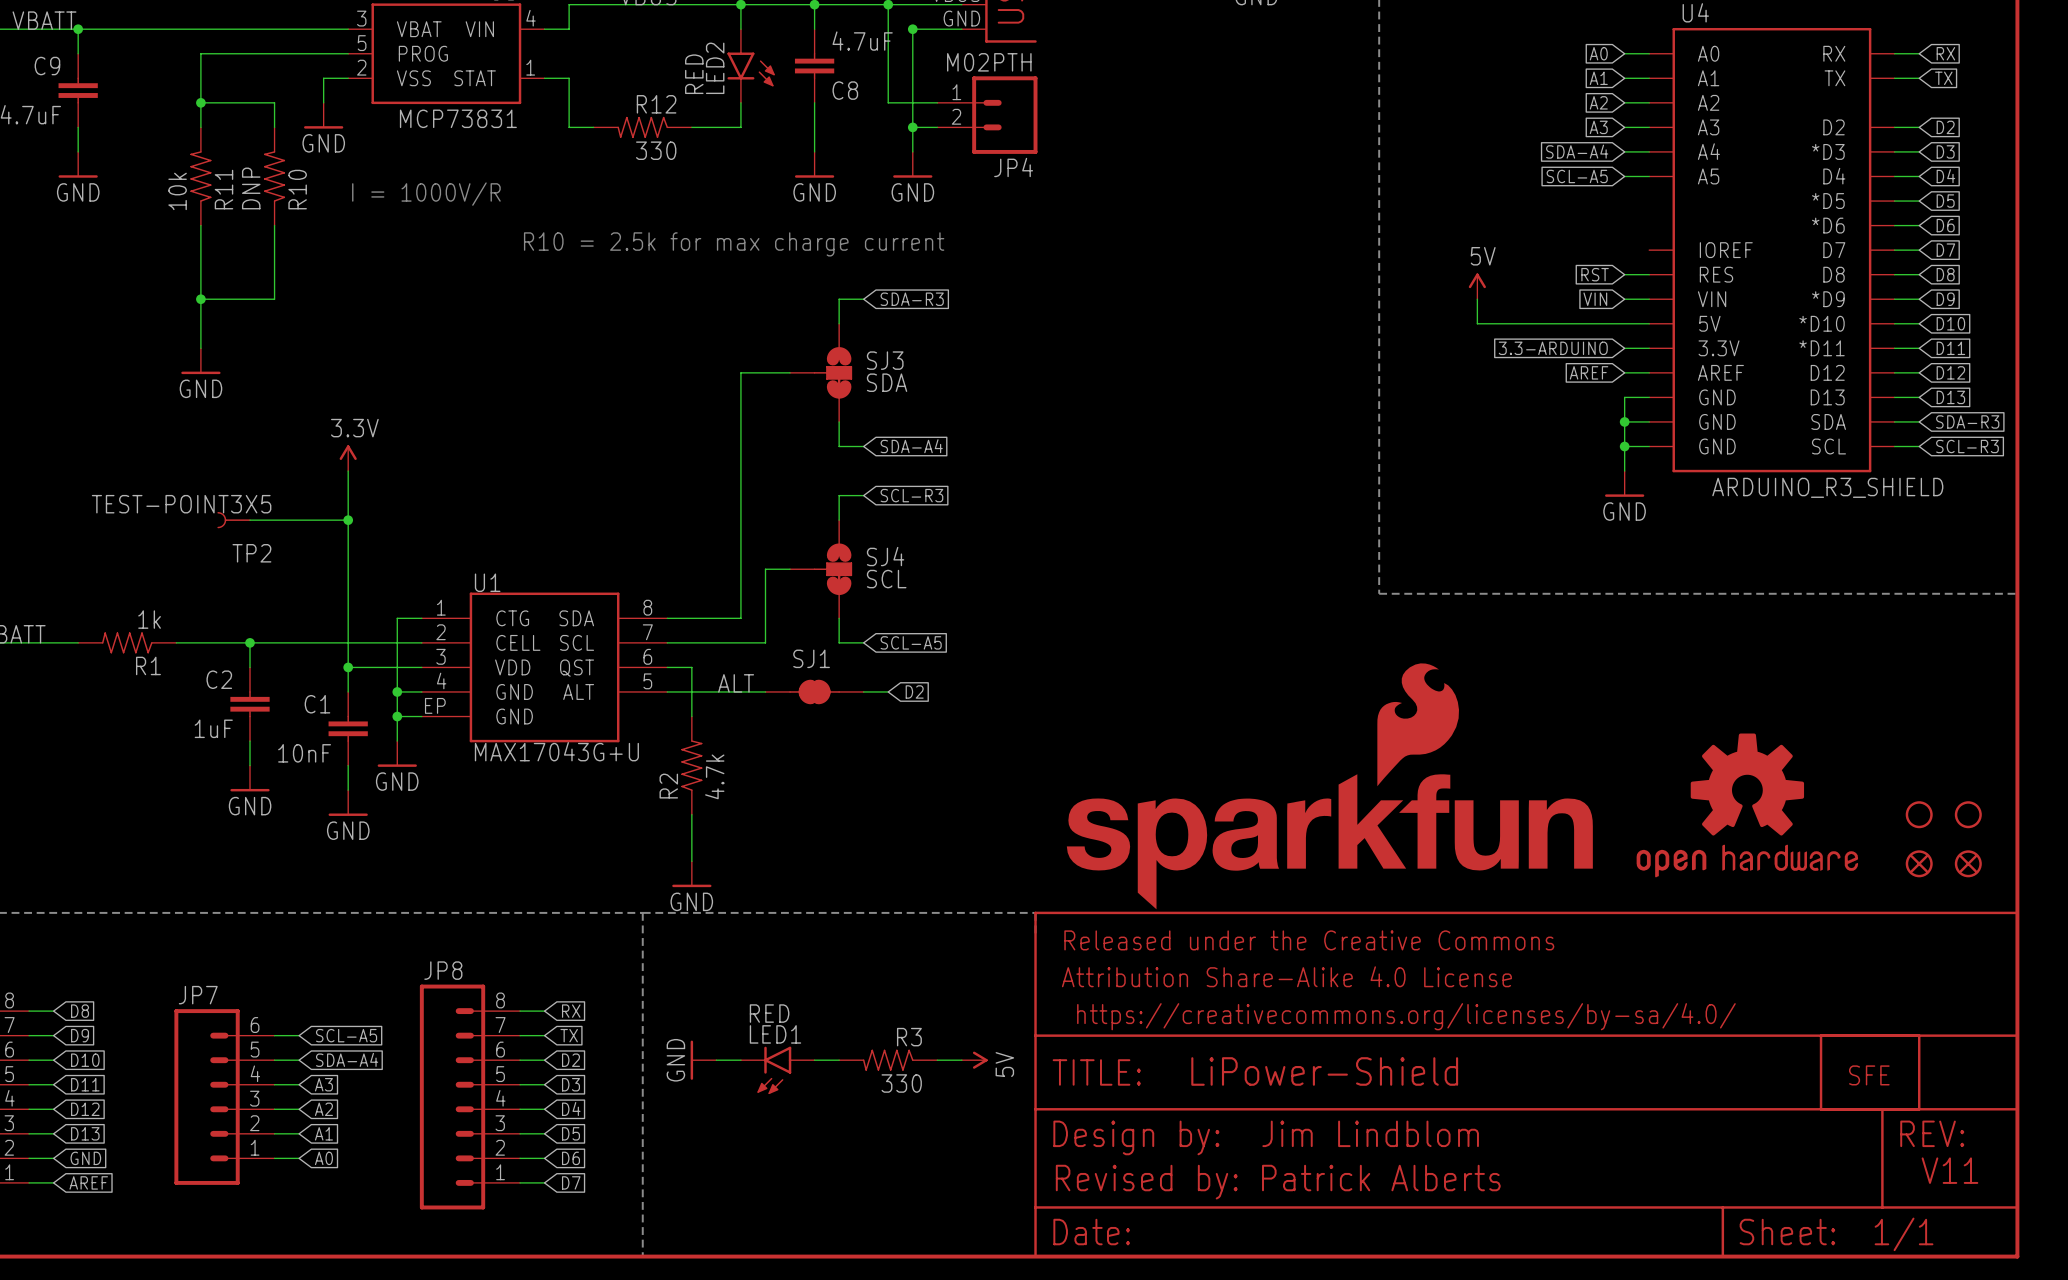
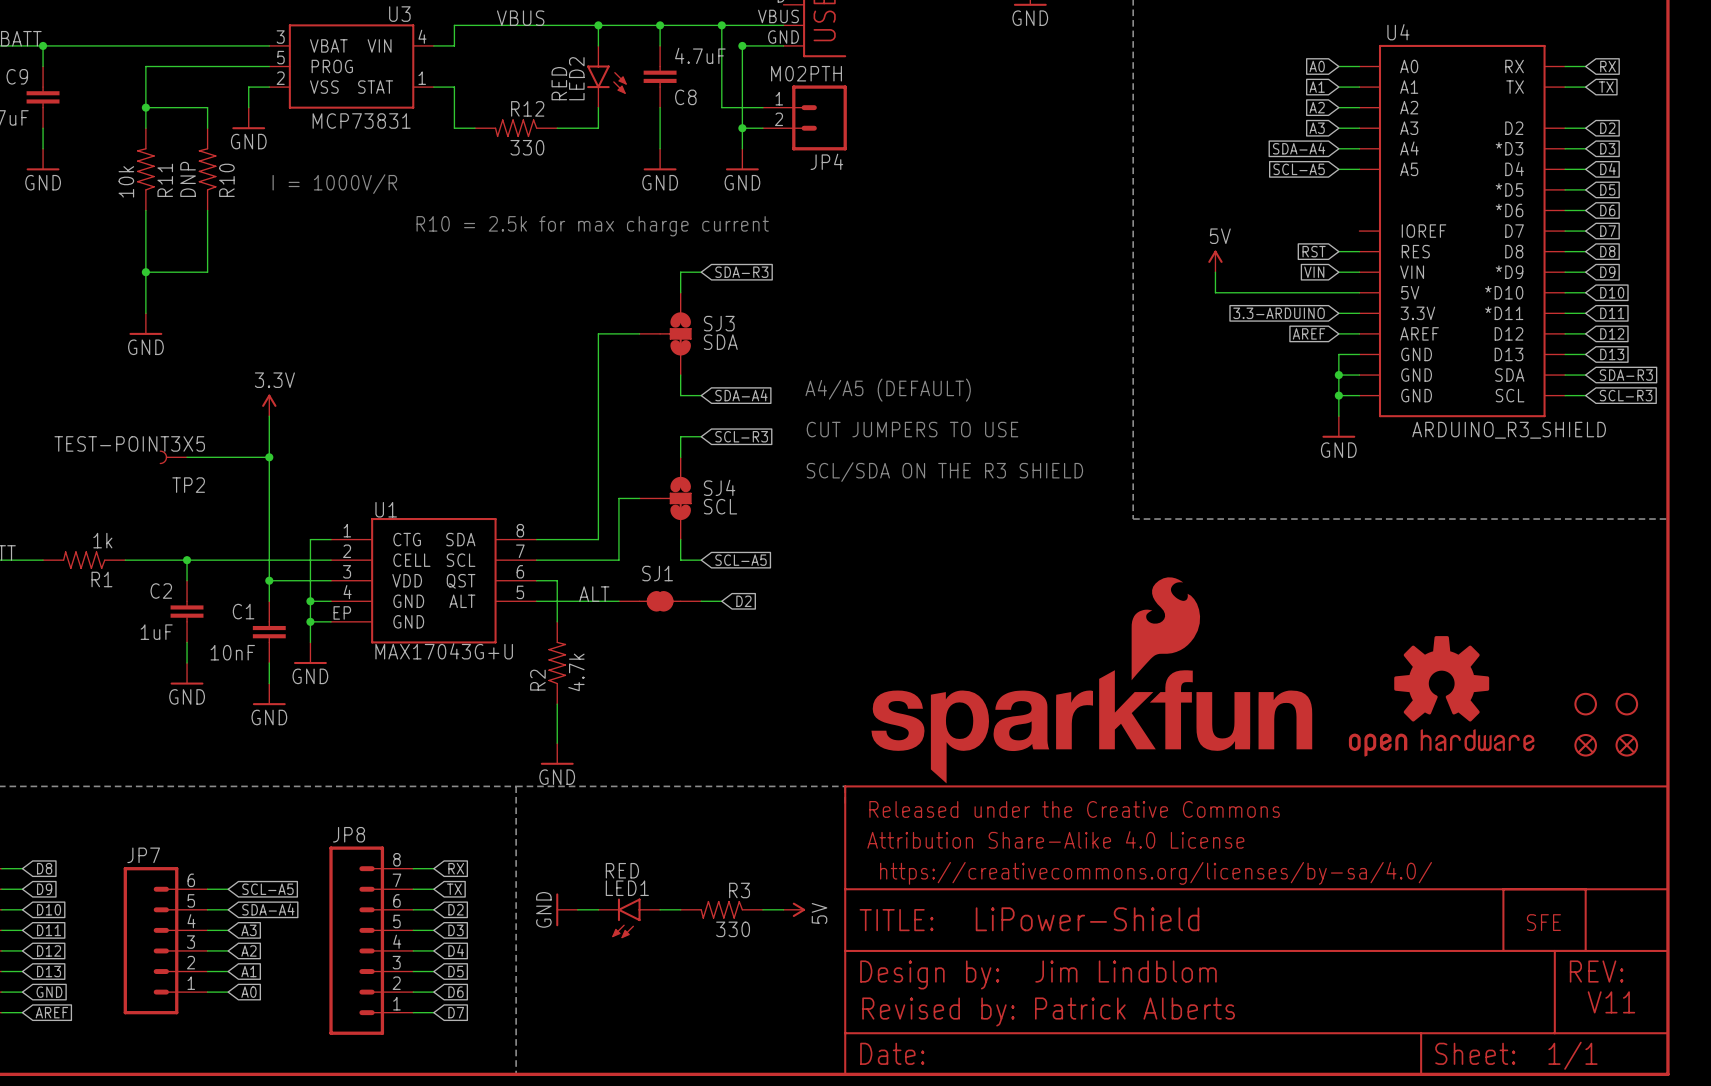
text: none -> A4/A5 (DEFAULT) (888, 390)
text: none -> CUT JUMPERS TO USE (912, 429)
text: none -> SCL/SDA ON THE R3 SHIELD (944, 472)

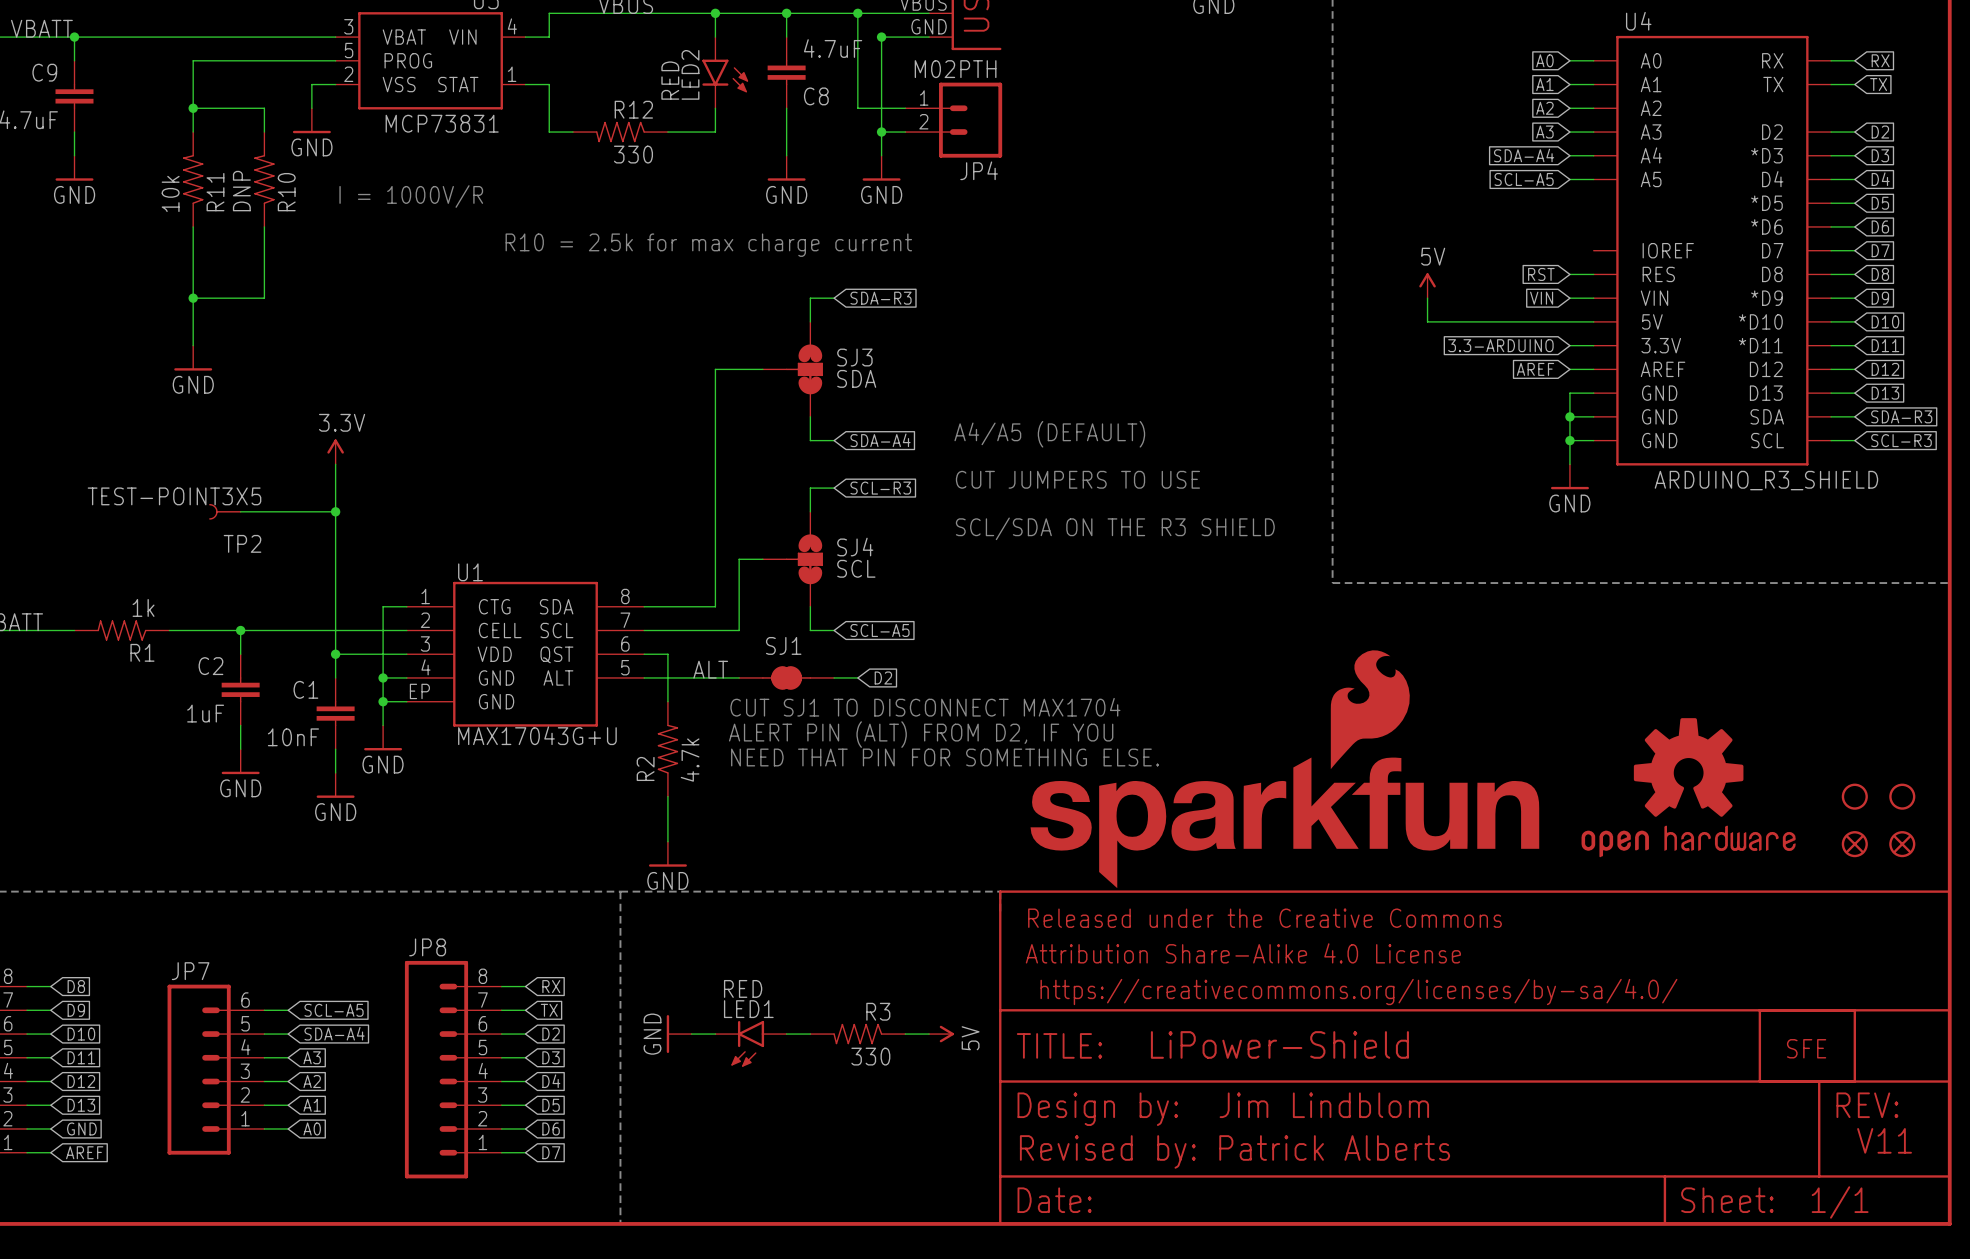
text: none -> CUT SJ1 TO DISCONNECT MAX1704 (925, 707)
text: none -> ALERT PIN (ALT) FROM D2, IF YOU (921, 734)
text: none -> NEED THAT PIN FOR SOMETHING ELSE. (945, 757)

